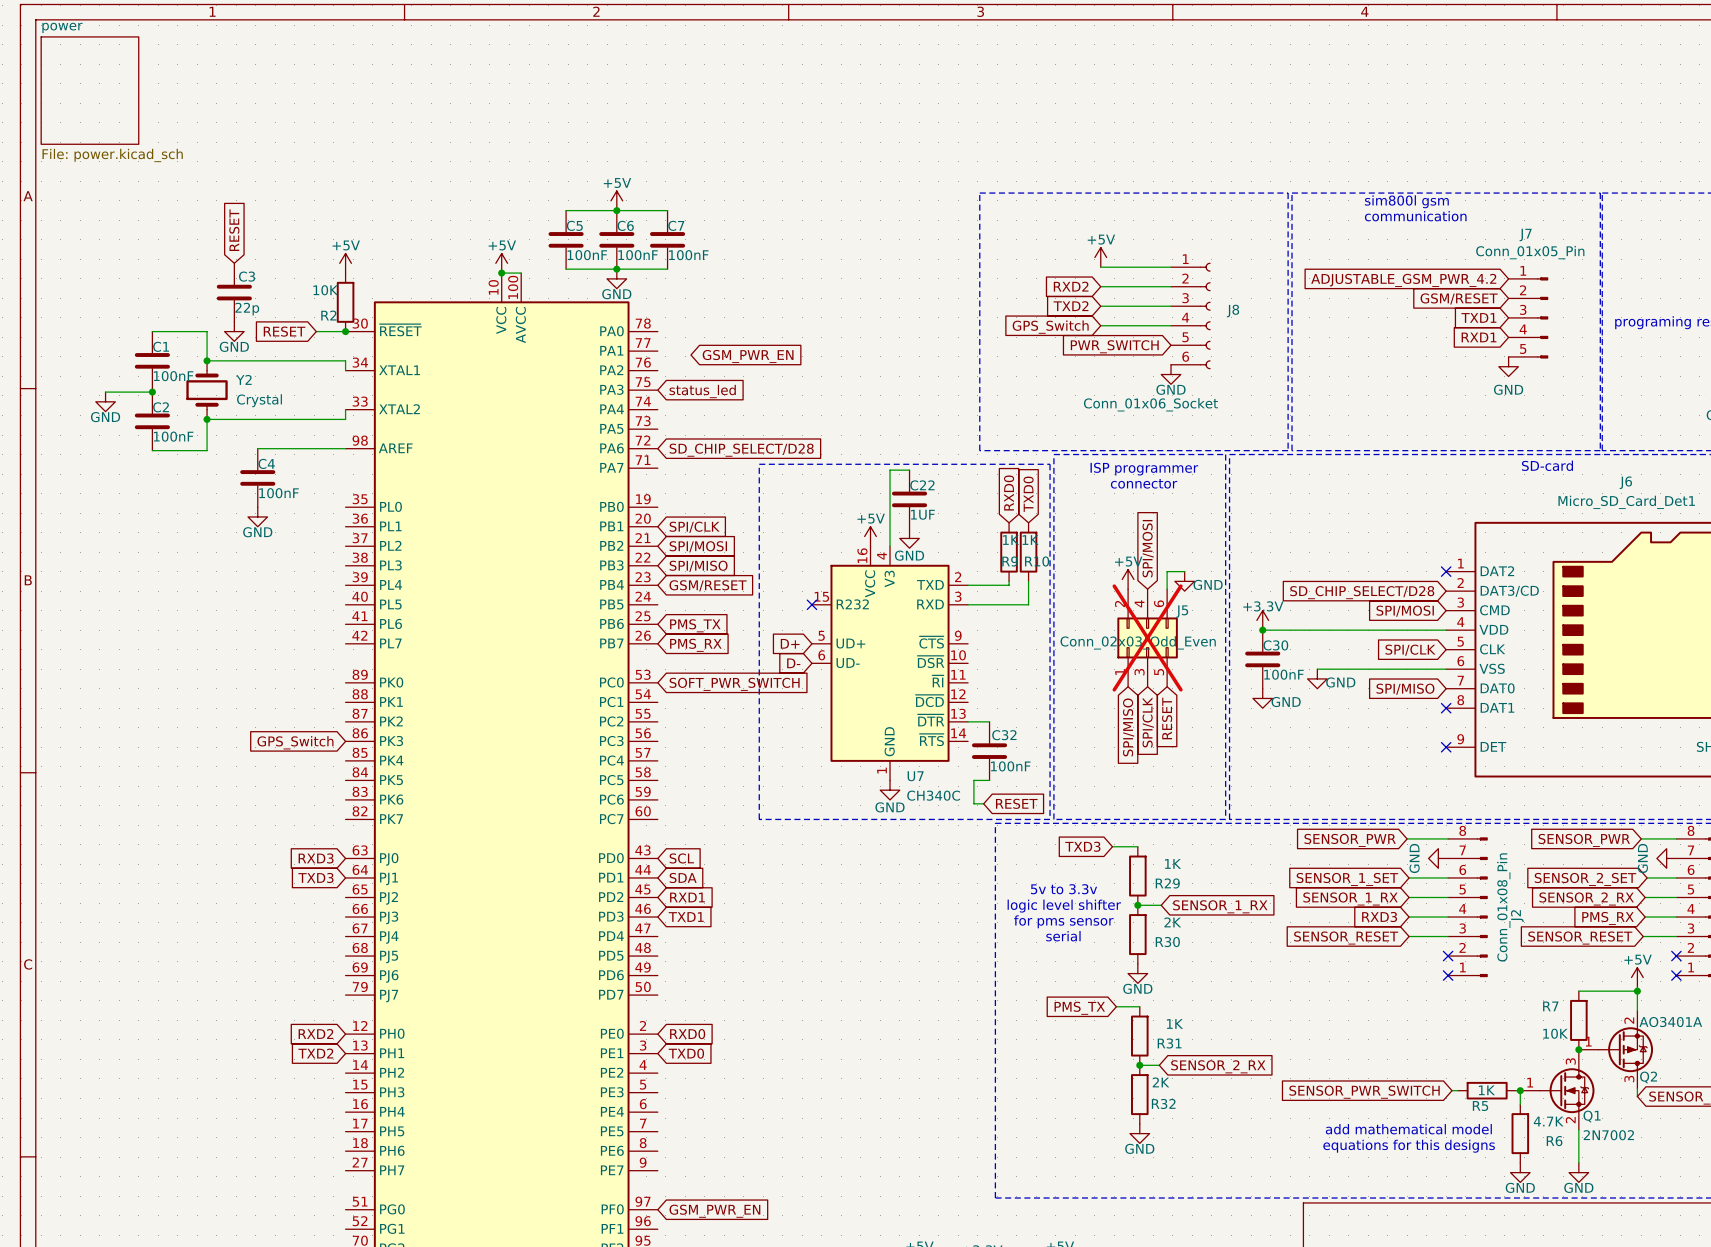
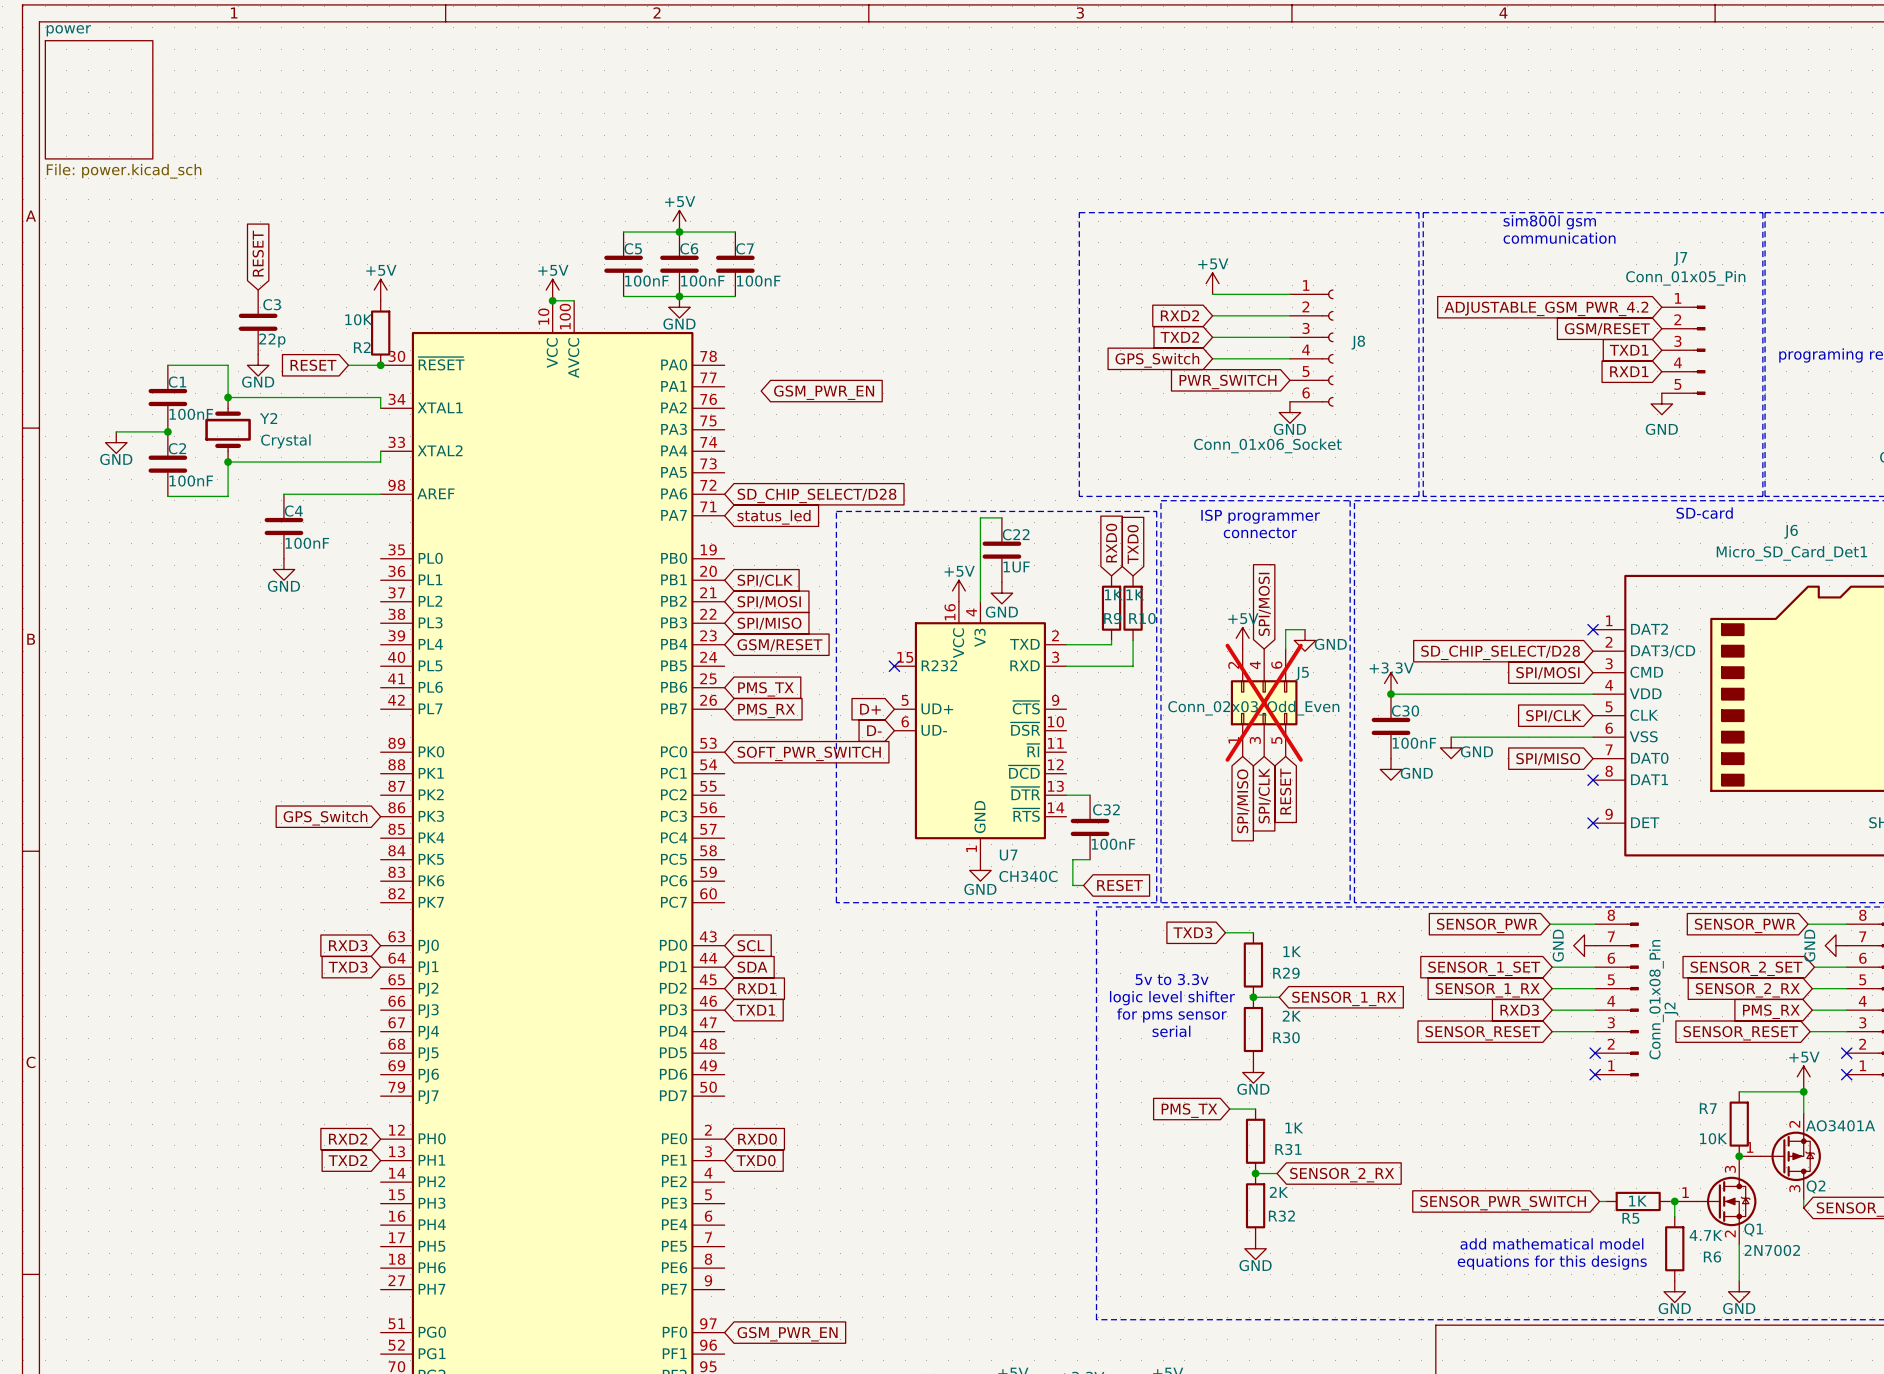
global label position: status_led (702, 391) -> status_led (774, 517)

